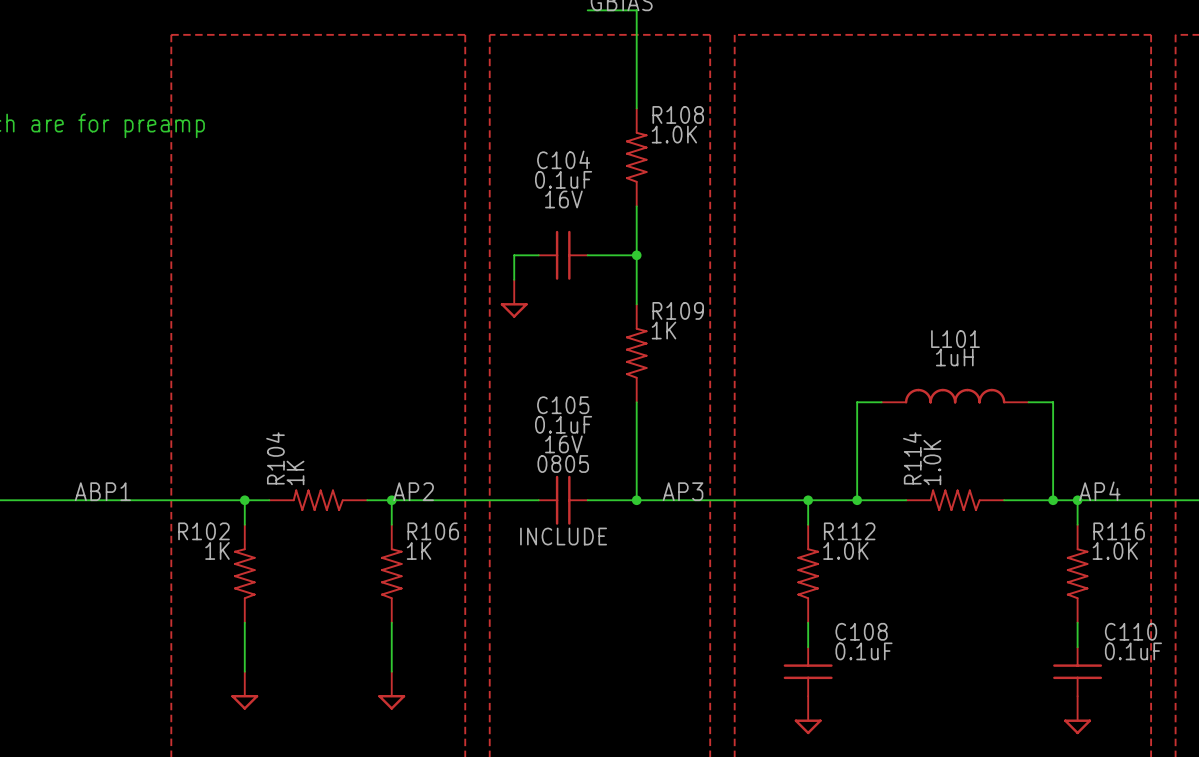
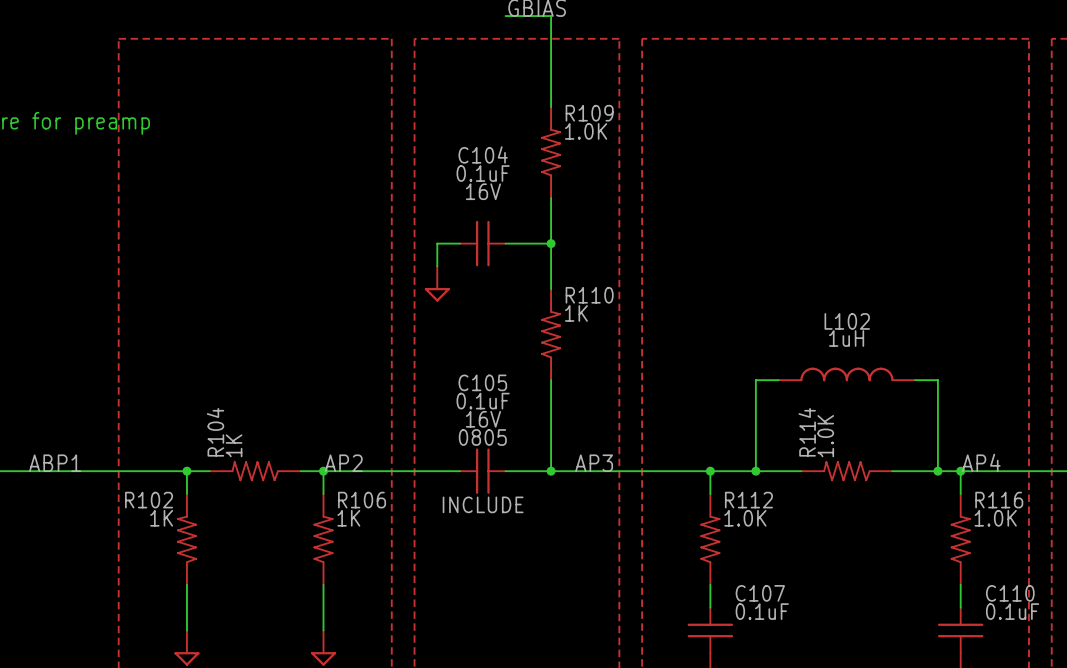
R108 name: R108 (678, 114) -> R109 (589, 113)
R109 name: R109 (678, 310) -> R110 (589, 295)
L101 name: L101 (955, 339) -> L102 (847, 321)
C108 name: C108 (861, 631) -> C107 (760, 593)

